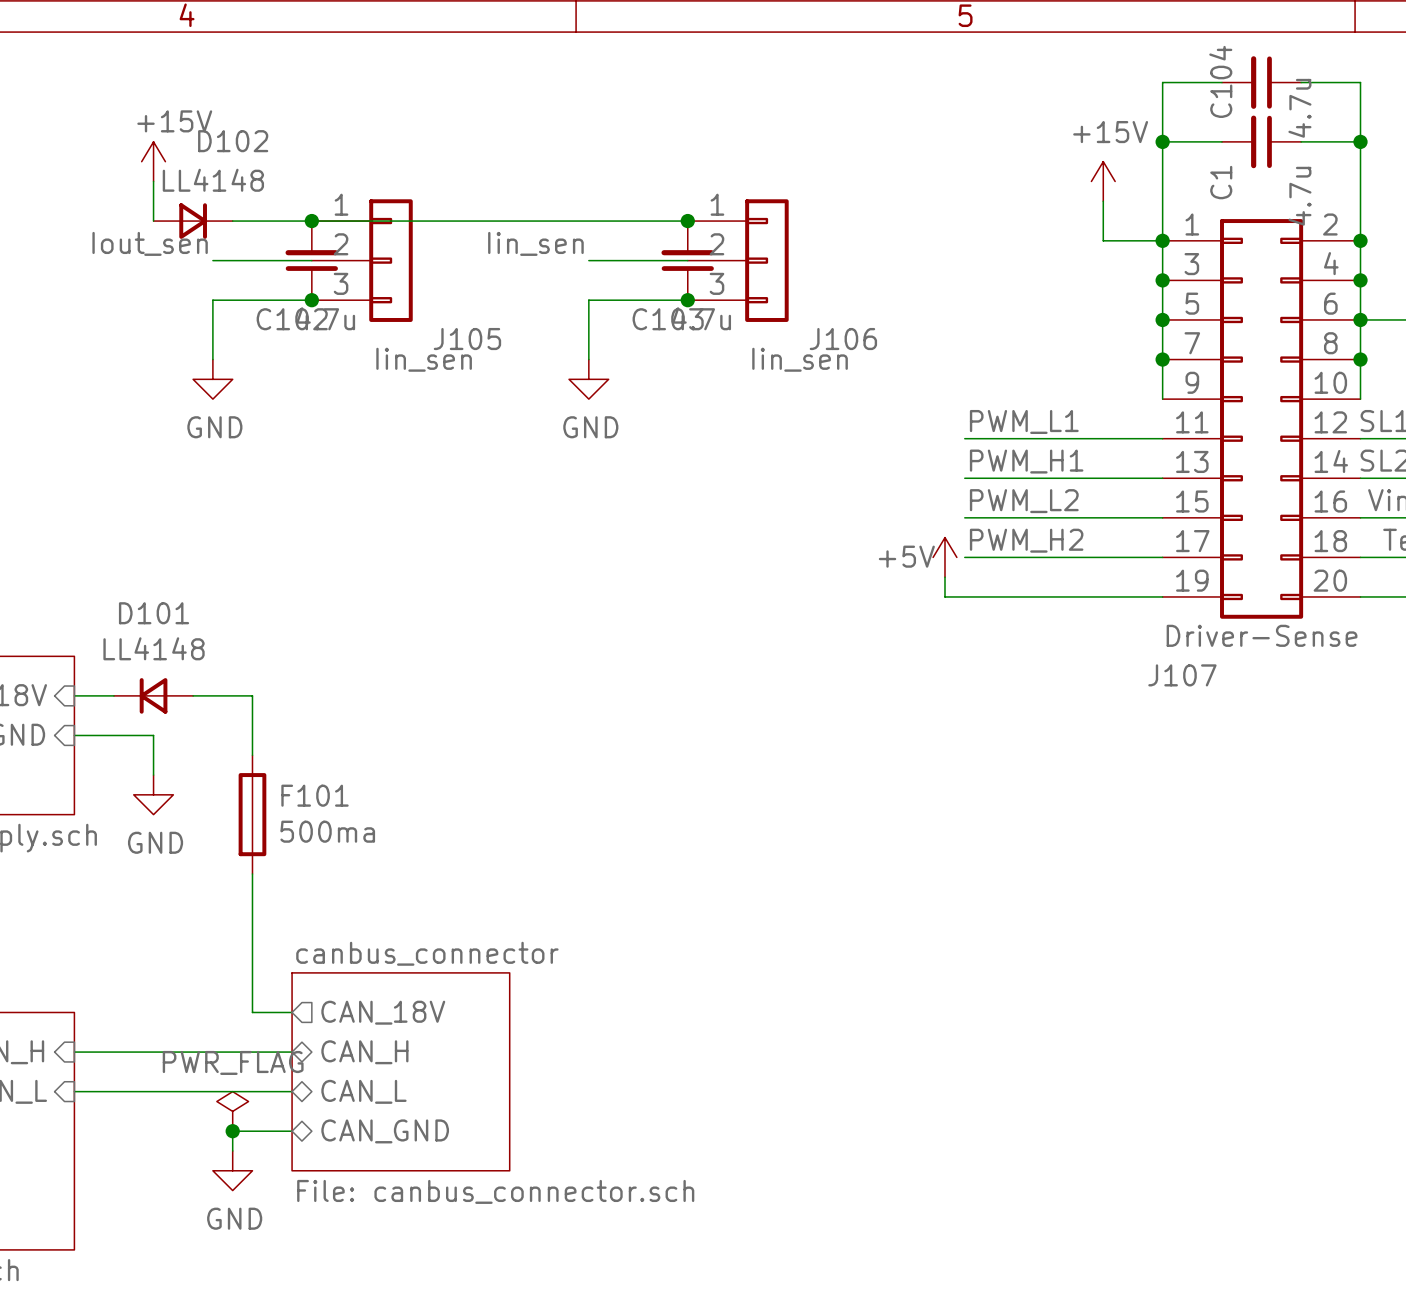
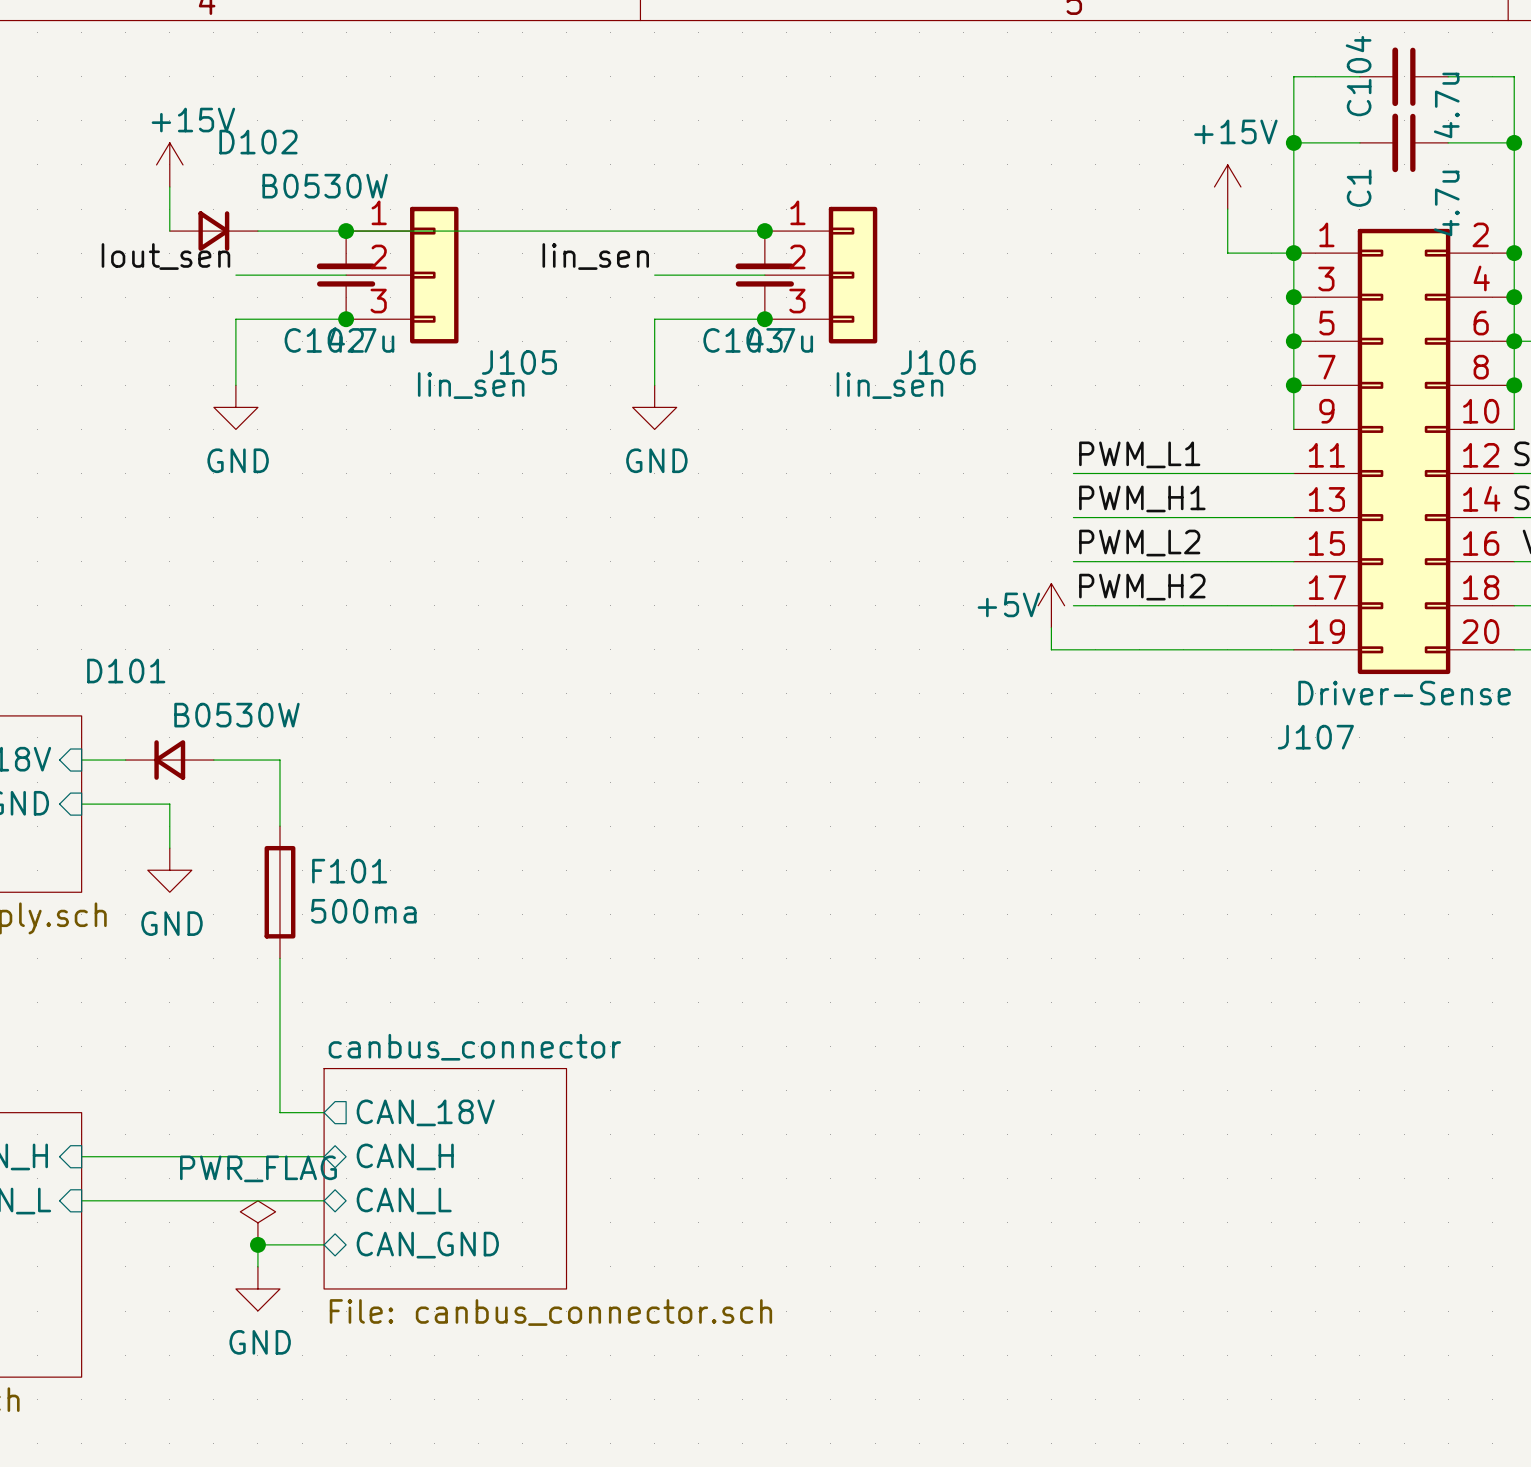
D102 value: LL4148 (213, 180) -> B0530W (325, 186)
D101 name position: D101 (154, 613) -> D101 (126, 671)
D101 value: LL4148 (154, 648) -> B0530W (236, 715)

